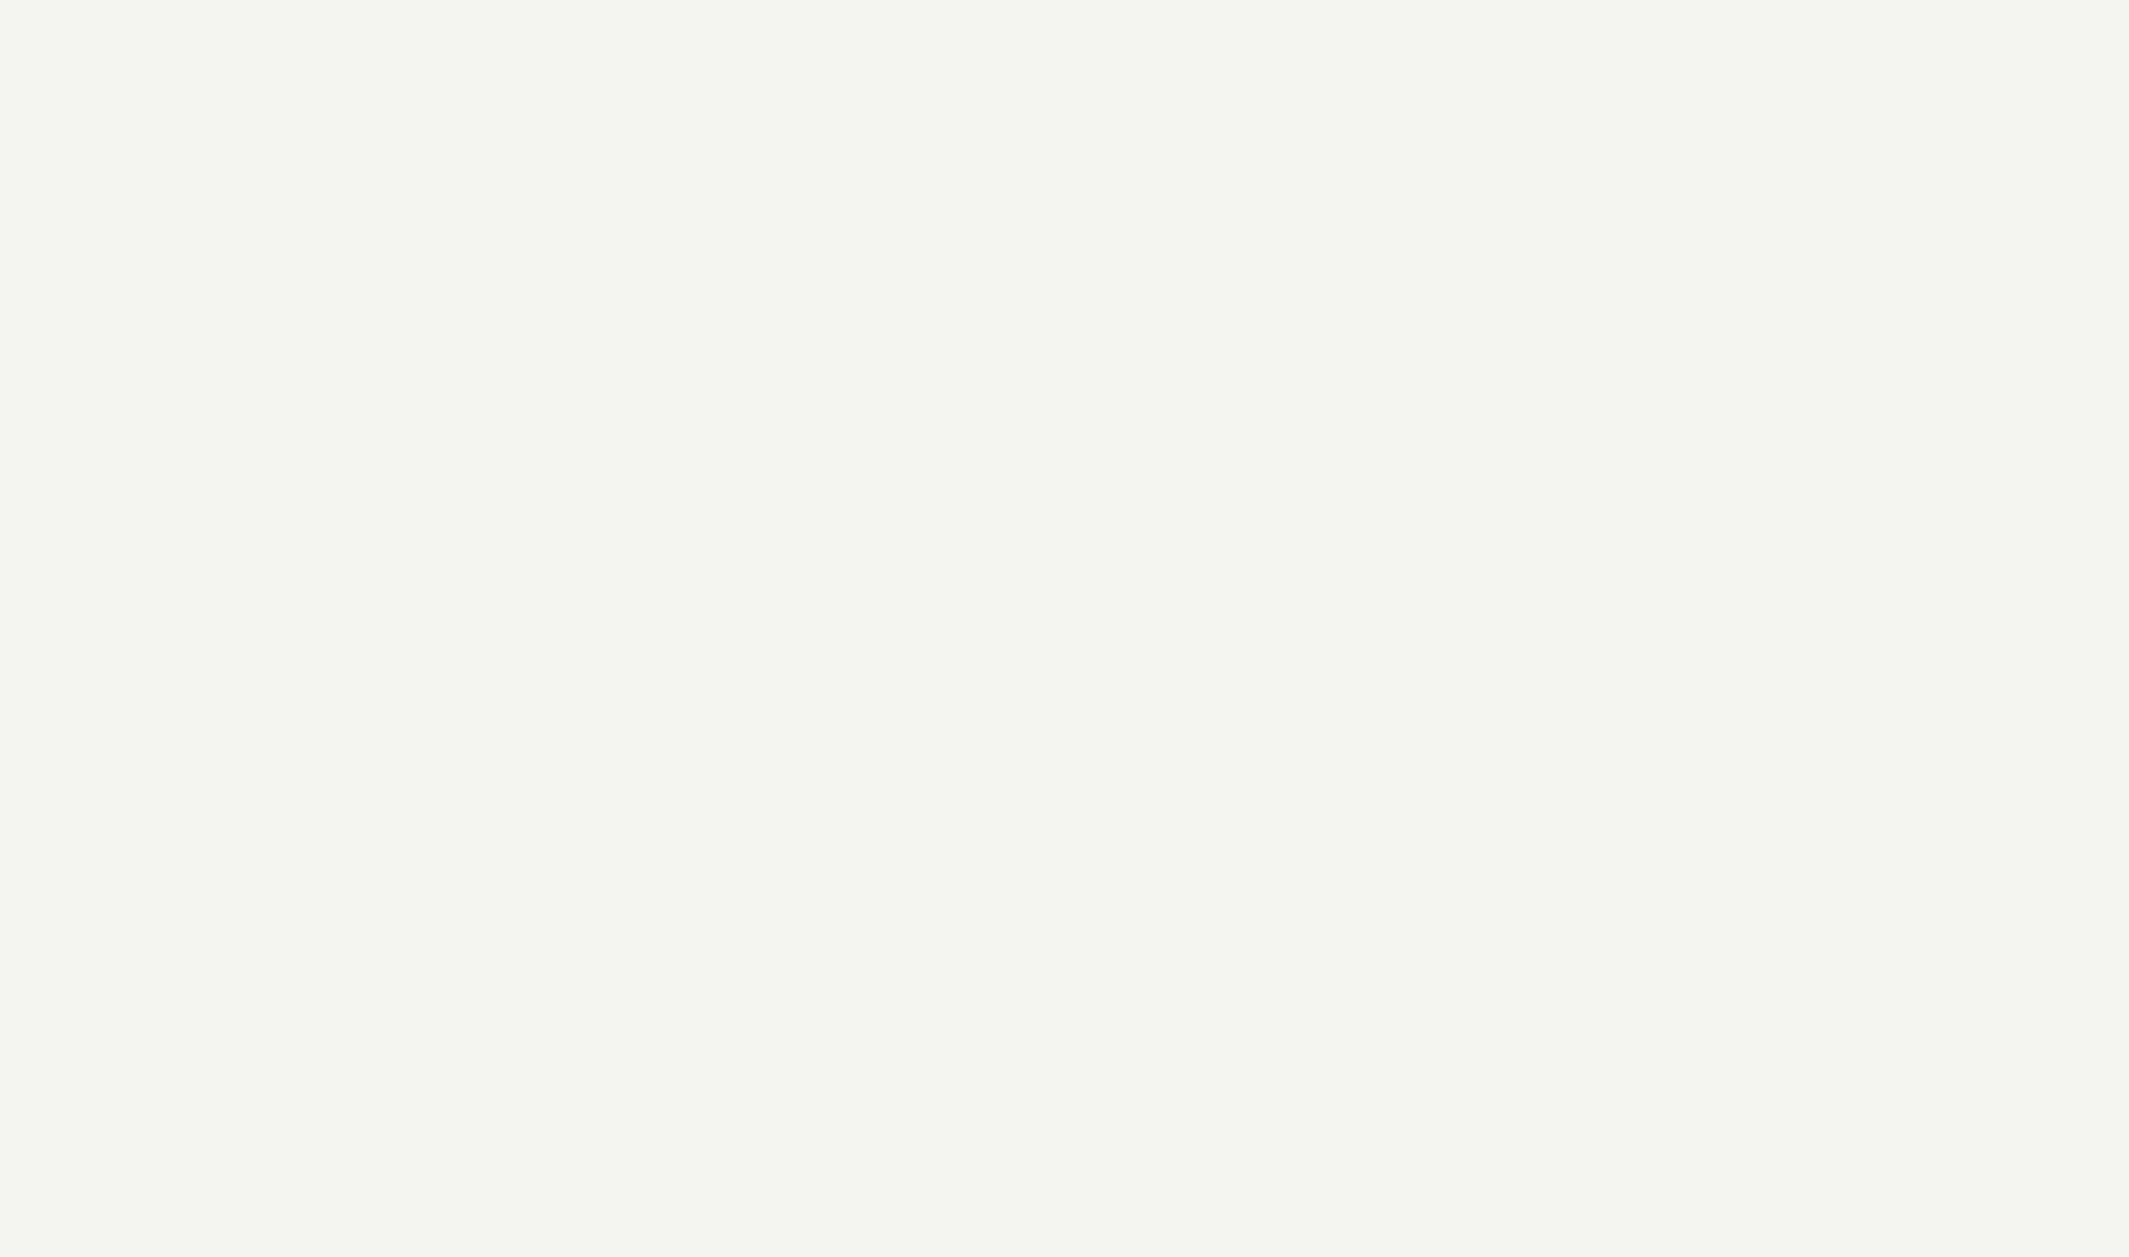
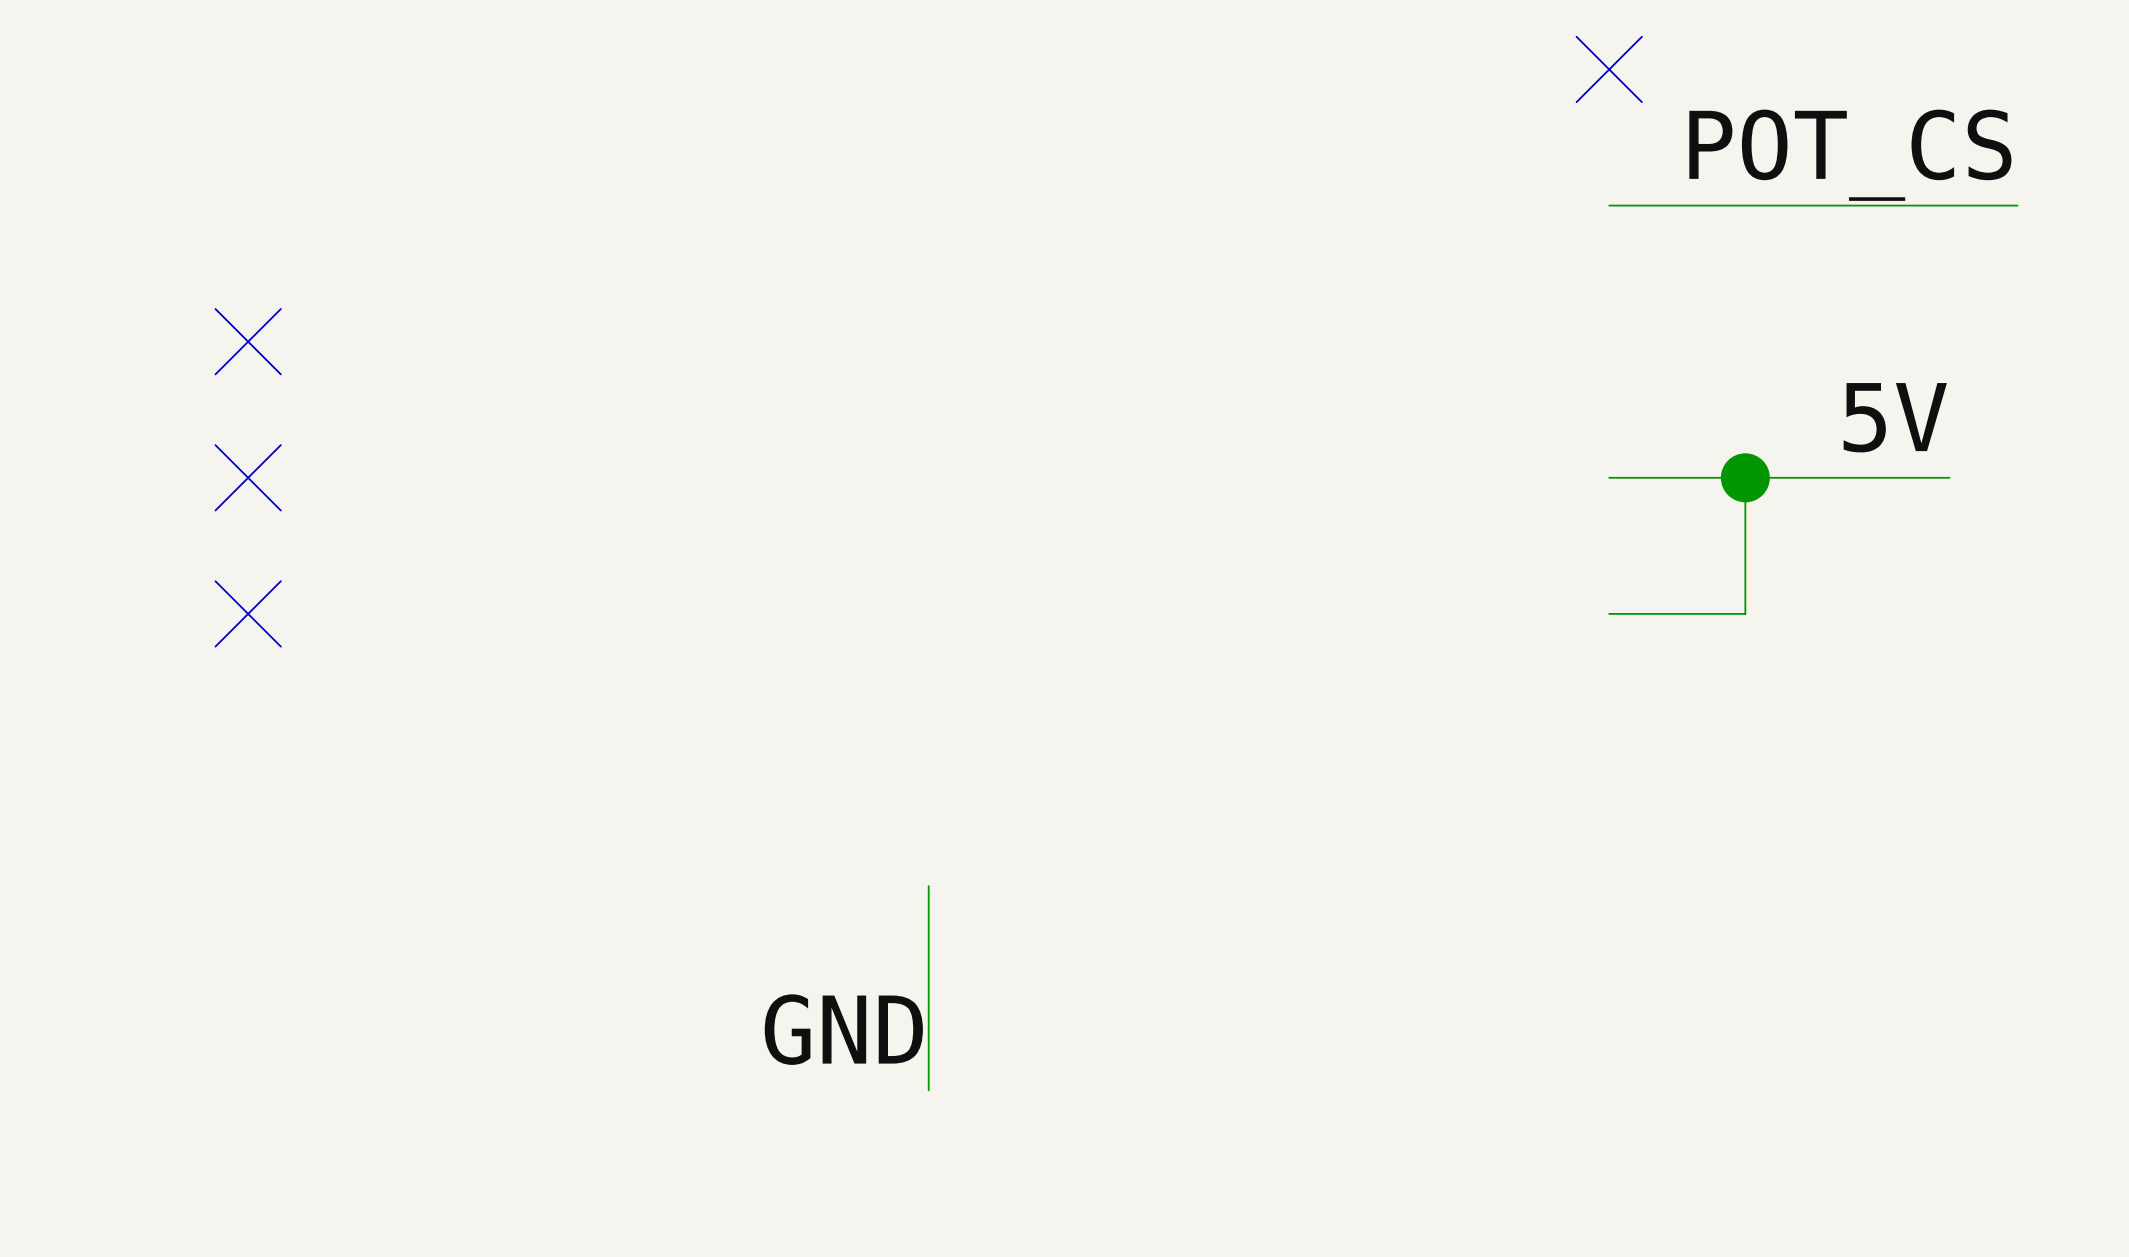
no-connect mark: none -> (1609, 69)
label: none -> POT_CS (1850, 155)
wire: none -> (1609, 205) (2017, 205)
no-connect mark: none -> (248, 341)
label: none -> 5V (1895, 417)
no-connect mark: none -> (248, 477)
wire: none -> (1609, 477) (1949, 477)
wire: none -> (1745, 477) (1745, 613) (1609, 613)
junction: none -> (1745, 477)
no-connect mark: none -> (248, 613)
wire: none -> (928, 886) (928, 1090)
label: none -> GND (843, 1029)

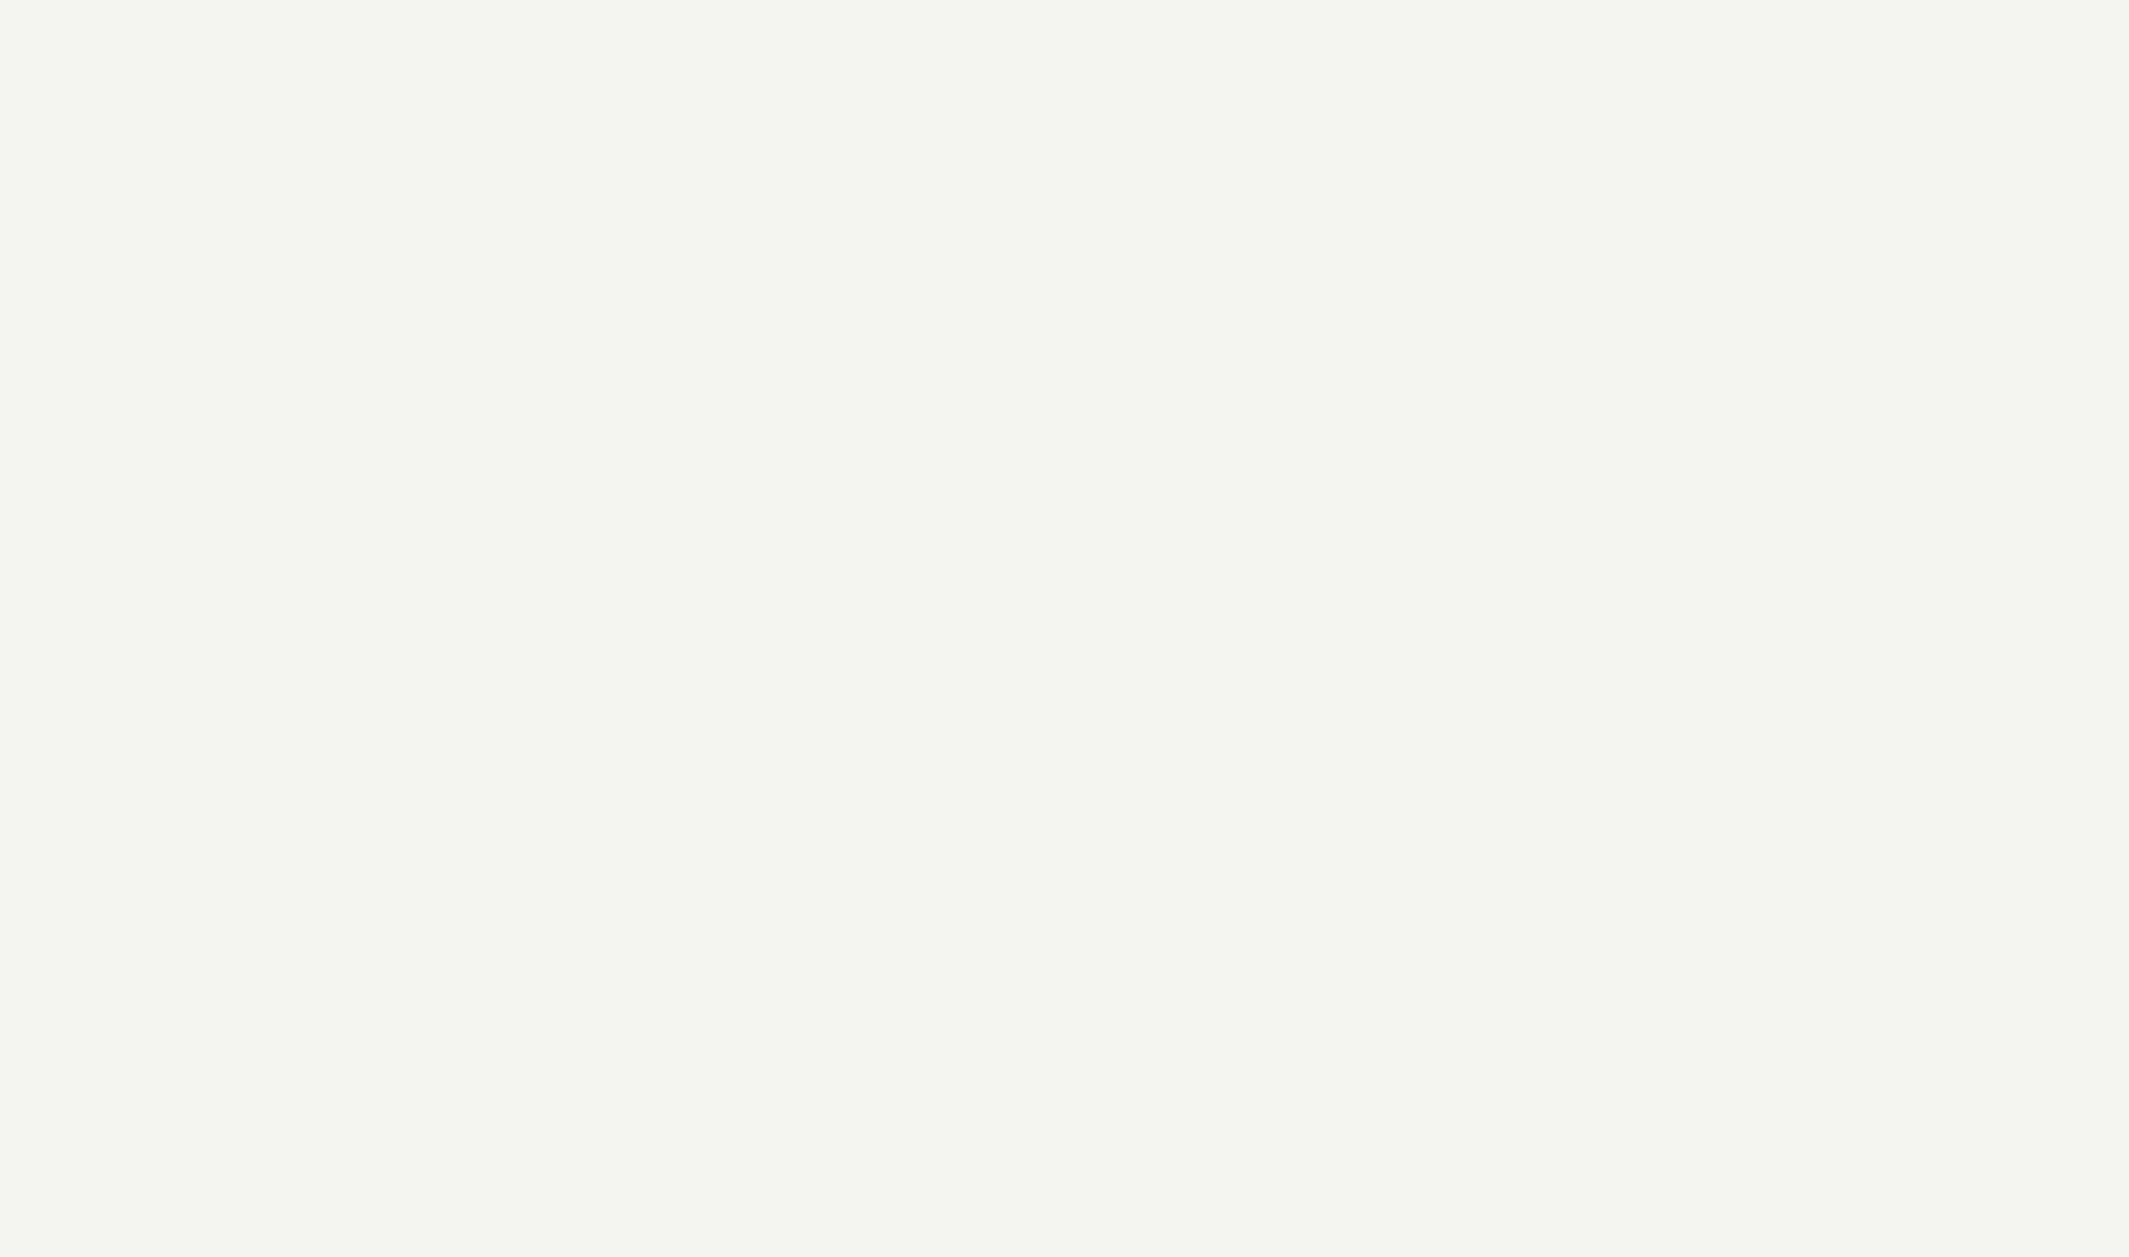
no-connect mark: (1609, 69) -> none
label: POT_CS (1850, 155) -> none
wire: (1609, 205) (2017, 205) -> none
no-connect mark: (248, 341) -> none
label: 5V (1895, 417) -> none
no-connect mark: (248, 477) -> none
wire: (1609, 477) (1949, 477) -> none
wire: (1745, 477) (1745, 613) (1609, 613) -> none
junction: (1745, 477) -> none
no-connect mark: (248, 613) -> none
wire: (928, 886) (928, 1090) -> none
label: GND (843, 1029) -> none

